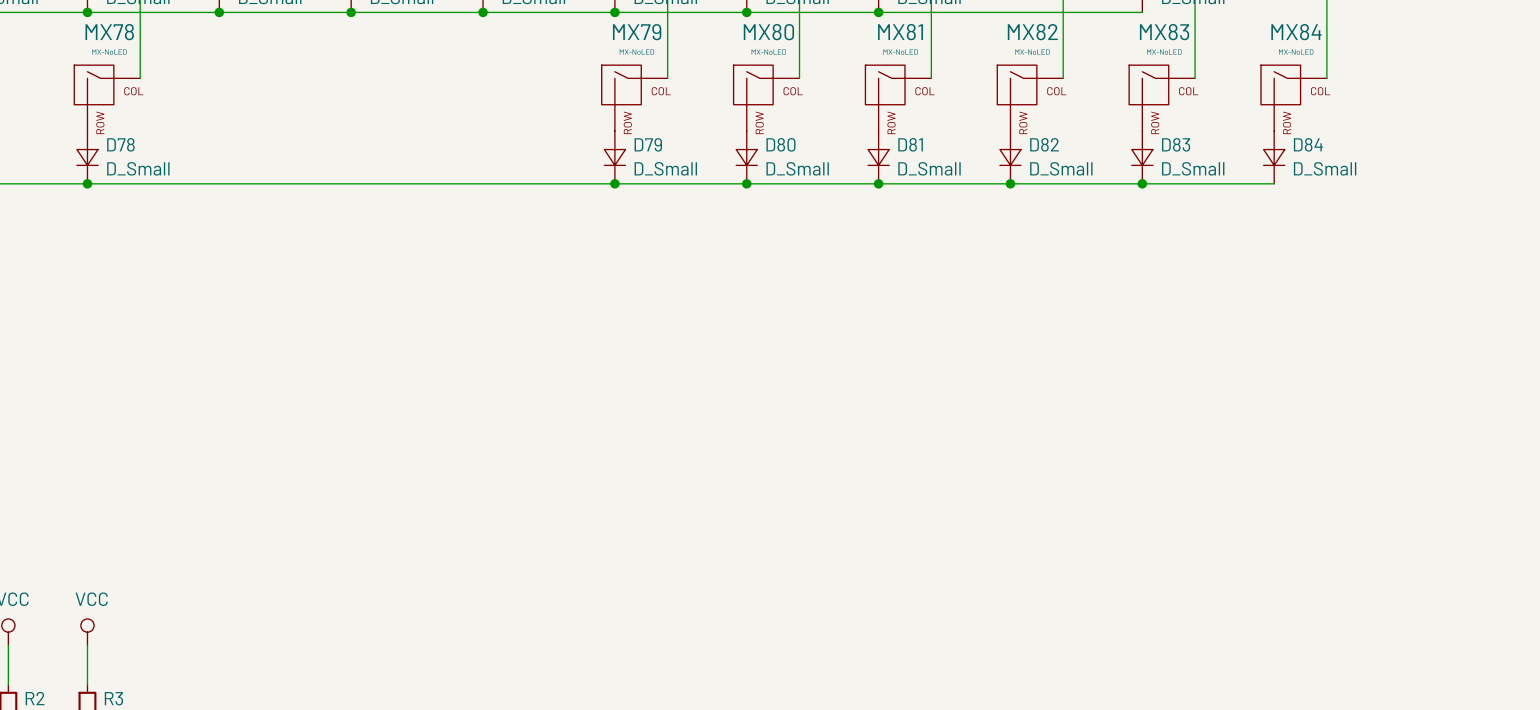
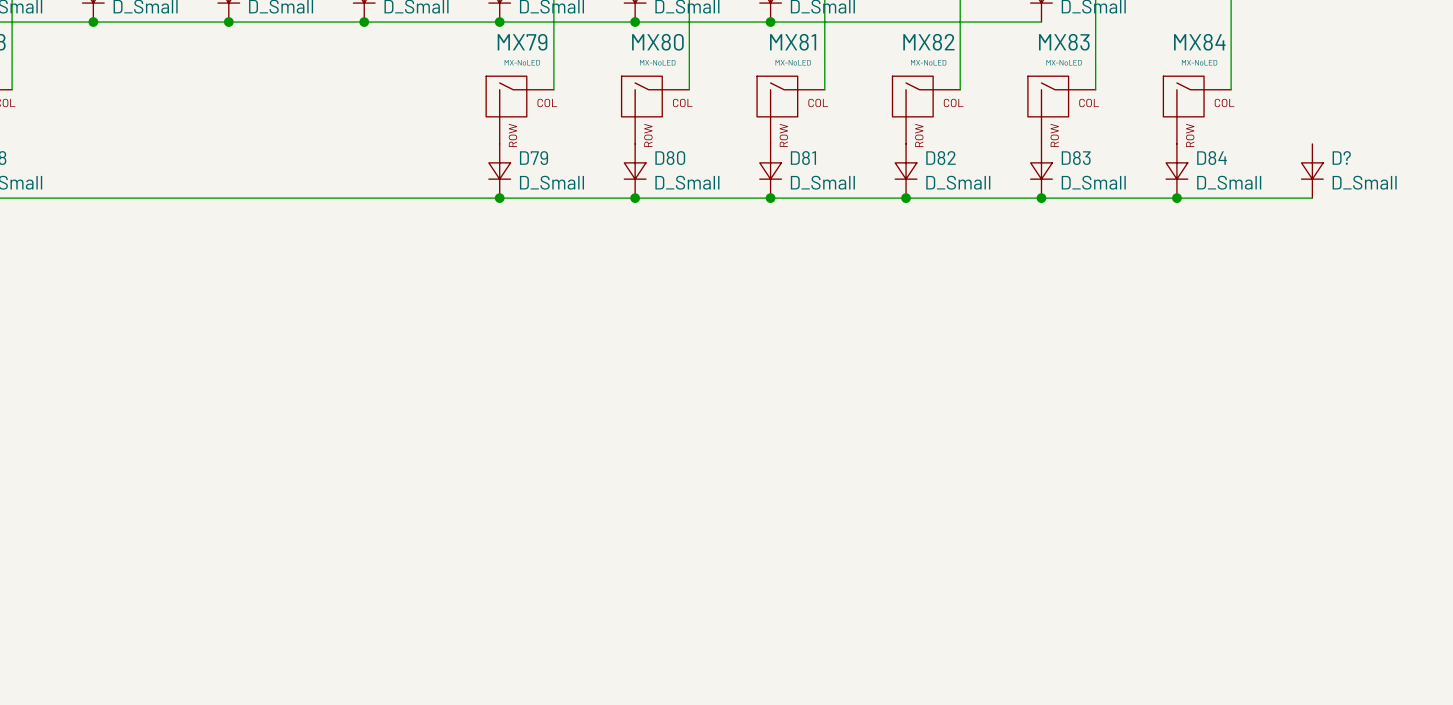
D?: none -> D_Small (1312, 171)
wire: none -> (1176, 198) (1312, 198)
junction: none -> (1176, 198)

